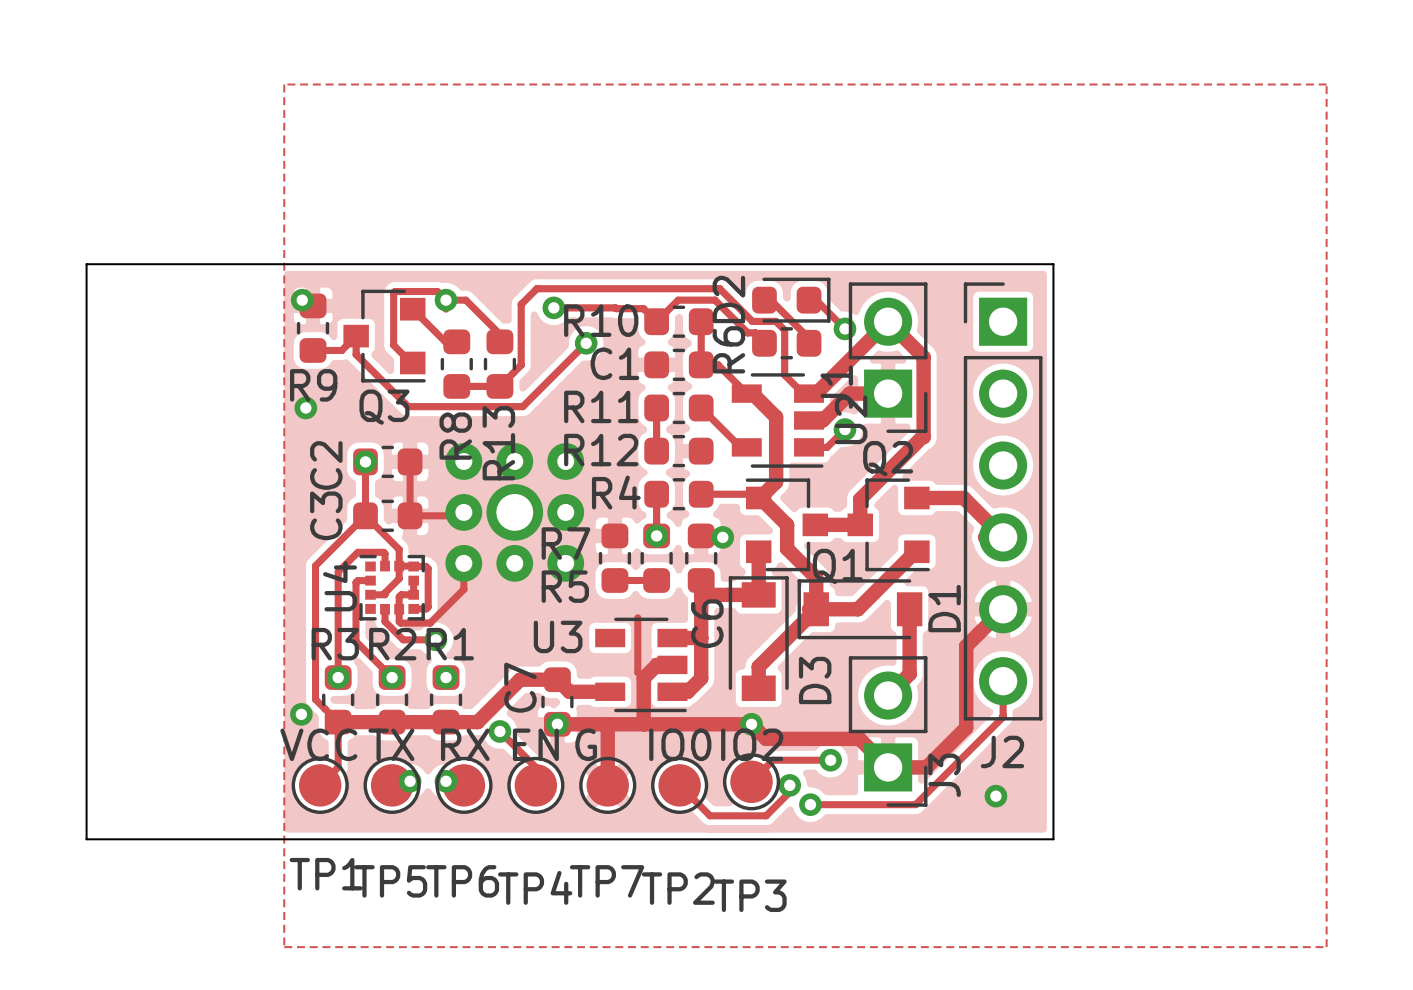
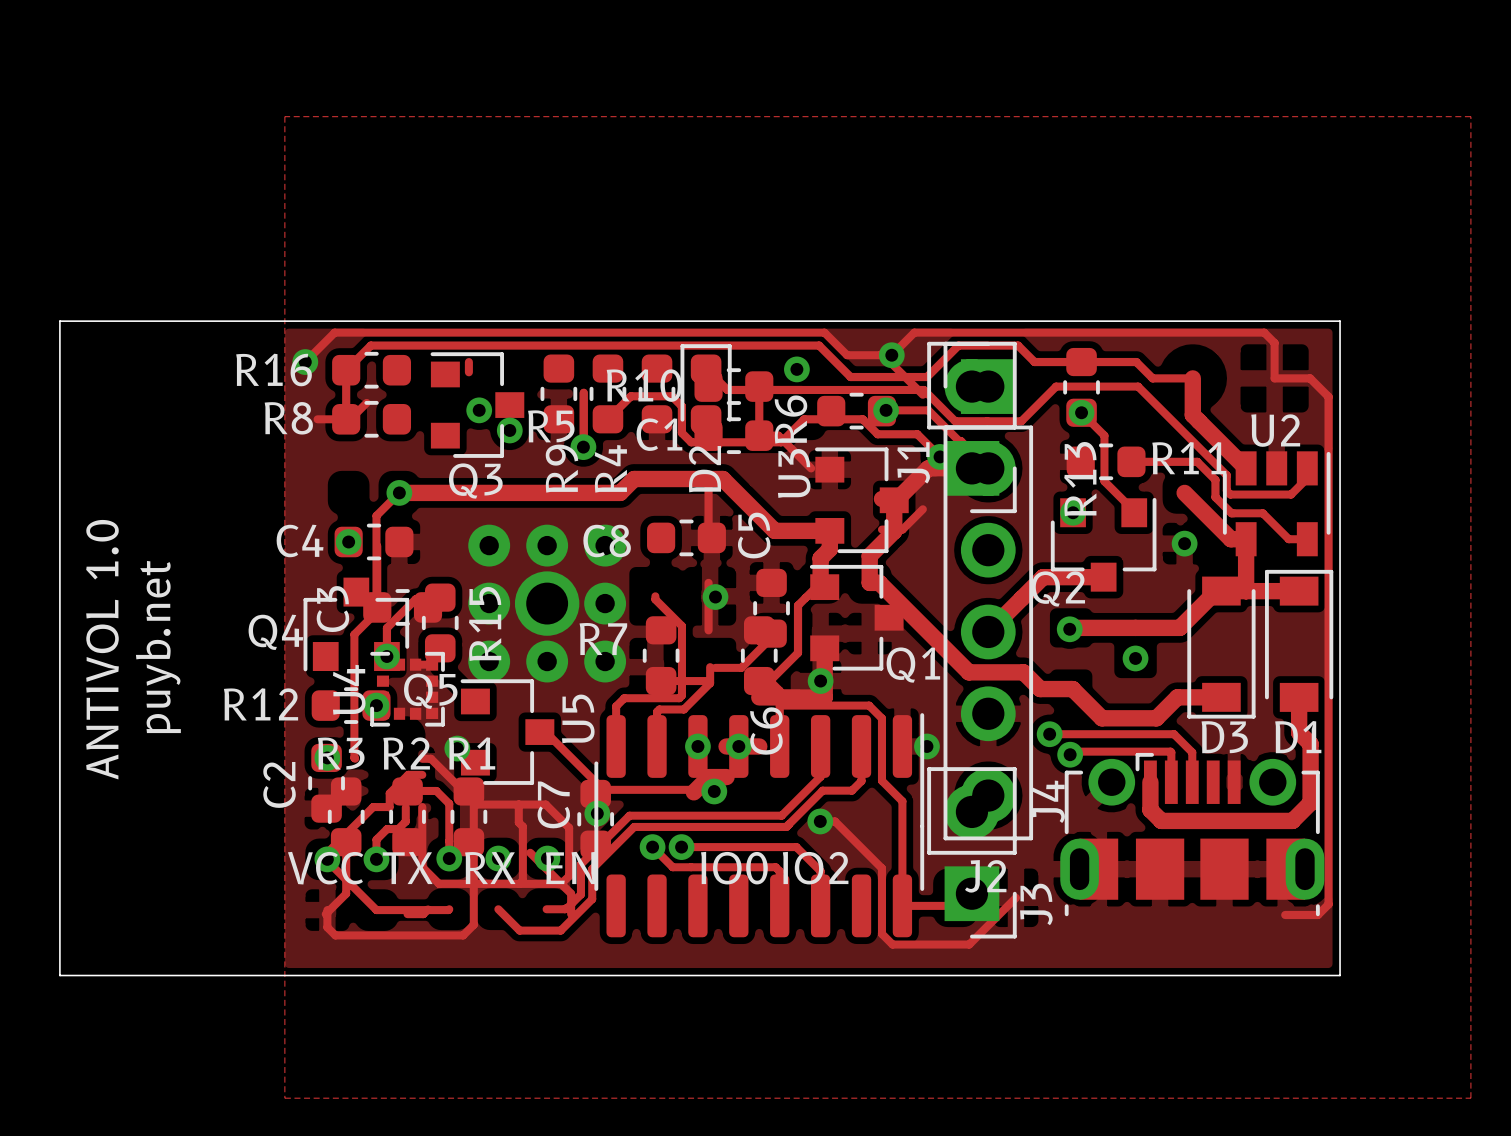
board edge: (1053, 264) (1053, 839) -> (1160, 321) (1340, 321) (1340, 975) (1160, 975)
via: none -> (891, 355)
track: none -> (305, 362) (334, 332) (824, 332) (847, 355) (891, 355) (914, 332) (1264, 332) (1274, 342) (1274, 378) (1310, 378) (1328, 396) (1328, 904) (1317, 914) (1285, 914)
via: (446, 300) -> none
track: (764, 300) (770, 300) (809, 338) (807, 343) -> none
D2 rotation: 0° (791, 300) -> 90° counterclockwise (706, 388)
D2 position: (791, 300) -> (706, 388)
track: none -> (706, 368) (727, 389) (923, 389) (955, 421) (1021, 421) (1056, 386) (1138, 386) (1226, 475) (1226, 490) (1230, 494) (1291, 494) (1307, 478) (1307, 468)
via: none -> (796, 369)
R16: none -> (371, 370)
track: (553, 307) (643, 308) (656, 321) (678, 300) (715, 300) (747, 332) (755, 332) (764, 343) -> none
via: (553, 307) -> none
track: (414, 309) (445, 341) (456, 341) -> none
R9 position: (313, 328) -> (558, 393)
via: (844, 328) -> none
track: (357, 336) (356, 354) (408, 406) (522, 406) (586, 343) -> none
Q3 rotation: 0° (384, 336) -> 180° (477, 405)
Q3 position: (384, 336) -> (477, 405)
track: (499, 341) (499, 334) (465, 300) (446, 300) (437, 291) (394, 291) (393, 345) (412, 362) -> none
via: none -> (479, 410)
track: none -> (886, 410) (928, 410) (988, 468)
via: none -> (886, 410)
via: (586, 343) -> none
track: none -> (1081, 412) (1104, 435) (1104, 481) (1134, 512)
via: none -> (1081, 412)
track: none -> (346, 419) (346, 370) (370, 345) (819, 345) (850, 377) (927, 377) (958, 345) (1018, 345) (1034, 362) (1136, 362) (1152, 378) (1192, 378) (1192, 415) (1246, 468)
track: none -> (607, 419) (630, 396) (671, 396) (681, 406) (681, 432) (691, 442) (781, 442) (804, 419) (862, 419) (877, 434) (917, 434) (940, 456)
via: none -> (509, 430)
R8 rotation: 0° (456, 364) -> 90° clockwise (371, 419)
R8 position: (456, 364) -> (371, 419)
R13 position: (499, 364) -> (1081, 387)
via: none -> (583, 447)
track: none -> (584, 447) (583, 392) (583, 450)
via: none -> (940, 456)
R9 name rotation: 0° (313, 385) -> 90° counterclockwise (561, 468)
track: (456, 386) (499, 386) (521, 365) (521, 304) (536, 288) (719, 288) (752, 321) (775, 321) (784, 330) (784, 375) (803, 393) (816, 393) (888, 321) (923, 357) (923, 437) (860, 499) (860, 524) (815, 524) -> none
track: none -> (1131, 461) (1197, 461) (1215, 479) (1215, 497) (1231, 513) (1262, 513) (1288, 539) (1307, 539)
track: (752, 393) (776, 417) (776, 481) (760, 497) (787, 524) (787, 548) (816, 577) (816, 609) (758, 666) (758, 688) -> none
R11 name position: R11 (601, 406) -> R11 (1189, 458)
via: (305, 407) -> none
R11 position: (678, 407) -> (1106, 461)
track: (701, 407) (740, 447) (746, 447) -> none
via: none -> (399, 492)
track: none -> (1184, 492) (1230, 539) (1246, 539) (1246, 591)
U2 rotation: 0° (777, 420) -> 90° counterclockwise (1276, 503)
U2 position: (777, 420) -> (1276, 503)
track: none -> (894, 500) (894, 531) (869, 555) (869, 582) (879, 582) (968, 672) (1023, 672) (1040, 689) (1072, 689) (1101, 718) (1156, 718) (1177, 697) (1221, 697)
via: (844, 429) -> none
via: none -> (1073, 512)
R12 position: (678, 451) -> (351, 705)
C8: none -> (686, 537)
via: none -> (348, 541)
C4: none -> (374, 541)
via: none -> (1184, 543)
via: (365, 461) -> none
C2 rotation: 0° (387, 461) -> 90° clockwise (326, 783)
C2 position: (387, 461) -> (326, 783)
track: (410, 461) (410, 515) (460, 515) (463, 512) -> none
track: none -> (1103, 577) (1043, 577) (988, 631)
R4 name position: R4 (616, 492) -> R4 (610, 468)
R4 rotation: 0° (678, 494) -> 90° clockwise (607, 393)
R4 position: (678, 494) -> (607, 393)
track: (701, 494) (754, 494) (758, 497) -> none
track: (916, 497) (963, 497) (1003, 537) (985, 537) -> none
J2 position: (1003, 501) -> (988, 591)
track: none -> (1299, 591) (1216, 591) (1179, 627) (1071, 627) (1072, 627)
track: none -> (655, 596) (655, 599) (681, 626) (681, 695) (679, 698) (624, 698) (616, 706) (616, 746)
track: none -> (440, 599) (415, 599) (386, 628) (386, 656)
C5: none -> (771, 608)
Q2 rotation: 0° (888, 524) -> 90° counterclockwise (1103, 544)
Q2 position: (888, 524) -> (1103, 544)
R15: none -> (440, 622)
Q4: none -> (356, 624)
via position: (656, 535) -> (715, 597)
via: none -> (1069, 629)
via: (722, 537) -> none
track: none -> (771, 637) (741, 667) (715, 667)
text: none -> puyb.net (158, 647)
track: (916, 551) (857, 609) (808, 609) -> none
text: none -> ANTIVOL 1.0 (102, 649)
via: none -> (386, 656)
R5 position: (656, 558) -> (657, 393)
via: none -> (1135, 658)
track: (463, 563) (463, 589) (430, 623) (399, 621) (399, 596) (401, 594) (413, 594) (413, 580) -> none
track: (385, 566) (383, 552) (357, 552) (338, 571) (338, 677) -> none
track: (413, 566) (426, 566) (428, 568) (428, 607) (426, 608) (413, 608) -> none
track: none -> (710, 667) (710, 683) (683, 709) (659, 709) (657, 711) (657, 746)
track: (370, 580) (357, 580) (356, 582) (356, 641) (392, 677) -> none
track: (701, 580) (701, 678) (687, 691) (672, 691) -> none
via: none -> (820, 681)
track: (370, 594) (385, 594) (399, 578) (399, 549) (365, 515) (315, 565) (315, 699) (338, 722) (477, 722) (520, 679) (557, 679) (569, 691) (610, 691) -> none
track: none -> (1299, 697) (1299, 732) (1310, 744) (1310, 802) (1292, 820) (1161, 820) (1150, 809) (1150, 782)
via: none -> (376, 705)
track: none -> (779, 705) (869, 705) (881, 718) (881, 780) (902, 801) (902, 905) (947, 905) (955, 897)
track: (385, 609) (385, 621) (403, 639) (435, 639) -> none
D1 rotation: 0° (859, 609) -> 90° clockwise (1299, 640)
D1 position: (859, 609) -> (1299, 640)
track: (909, 609) (909, 673) (888, 695) -> none
track: (1003, 609) (966, 646) (966, 727) (926, 767) (888, 767) (859, 738) (766, 738) (751, 724) (557, 724) -> none
U3 footprint: [595, 617, 688, 713] -> [815, 447, 909, 554]
track: (637, 617) (637, 672) (643, 678) (643, 724) -> none
Q5: none -> (507, 732)
track: none -> (539, 732) (545, 732) (603, 789) (712, 789) (718, 795)
track: none -> (1049, 734) (1174, 734) (1192, 752) (1192, 782)
via: none -> (1049, 734)
via: none -> (697, 746)
via: none -> (738, 746)
track: none -> (779, 746) (779, 690) (769, 681) (798, 652) (798, 605) (820, 582) (820, 558) (829, 549) (829, 530) (774, 530) (722, 479) (634, 479) (620, 492) (399, 492) (376, 515) (376, 612) (354, 634) (355, 758)
track: none -> (820, 746) (820, 776) (781, 815) (629, 815) (580, 864) (580, 894) (565, 909) (546, 909)
D3 rotation: 0° (758, 638) -> 180° (1221, 647)
D3 position: (758, 638) -> (1221, 647)
track: none -> (861, 746) (861, 781) (851, 790) (822, 790) (786, 826) (634, 826) (592, 868) (592, 899) (560, 930) (519, 930) (498, 909)
via: none -> (926, 746)
track: none -> (1070, 754) (1073, 751) (1170, 751) (1171, 782)
via: none -> (1070, 754)
via: none -> (327, 757)
track: none -> (422, 758) (430, 758) (476, 804) (545, 804) (569, 827) (569, 876) (561, 883) (439, 883) (422, 867) (422, 807)
track: none -> (422, 774) (408, 774) (389, 793) (389, 807)
via: (338, 677) -> none
via: (392, 677) -> none
track: none -> (422, 790) (436, 790) (449, 803) (449, 858)
via: (446, 677) -> none
via: none -> (714, 791)
D3 name position: D3 (815, 680) -> D3 (1224, 737)
track: (1003, 681) (1003, 717) (915, 804) (810, 804) -> none
track: none -> (473, 801) (473, 882) (475, 883) (473, 885) (473, 924) (463, 935) (335, 935) (327, 927) (327, 910)
track: none -> (518, 804) (518, 822) (522, 826) (522, 880) (519, 883)
track: none -> (389, 807) (373, 807) (327, 852) (327, 861) (376, 910) (449, 909)
track: none -> (405, 807) (405, 821) (398, 829) (387, 829) (376, 839) (376, 859)
via: none -> (597, 813)
track: none -> (820, 821) (835, 821) (881, 868) (881, 933) (892, 944) (969, 944) (1015, 897)
U5: none -> (759, 825)
via position: (301, 714) -> (327, 859)
J4: none -> (1192, 834)
via: (557, 724) -> none
track: (607, 724) (607, 785) -> none
via position: (751, 724) -> (820, 821)
track: none -> (652, 847) (672, 867) (775, 867) (779, 871) (779, 905)
via: none -> (652, 847)
track: none -> (681, 847) (796, 847) (820, 871) (820, 905)
via: none -> (681, 847)
via position: (499, 731) -> (547, 858)
via: none -> (449, 858)
via: none -> (498, 858)
via: none -> (376, 859)
text: G (586, 744) -> none
track: (830, 760) (773, 760) (751, 781) -> none
via: (830, 760) -> none
via: (410, 781) -> none
via: (446, 781) -> none
TP3: (751, 781) -> none
TP1: (320, 785) -> none
TP5: (392, 785) -> none
TP6: (463, 785) -> none
TP4: (535, 785) -> none
TP7: (607, 785) -> none
track: (679, 785) (710, 815) (766, 815) (789, 792) (789, 785) -> none
TP2: (679, 785) -> none
via: (789, 785) -> none
via: (995, 796) -> none
via: (810, 804) -> none

